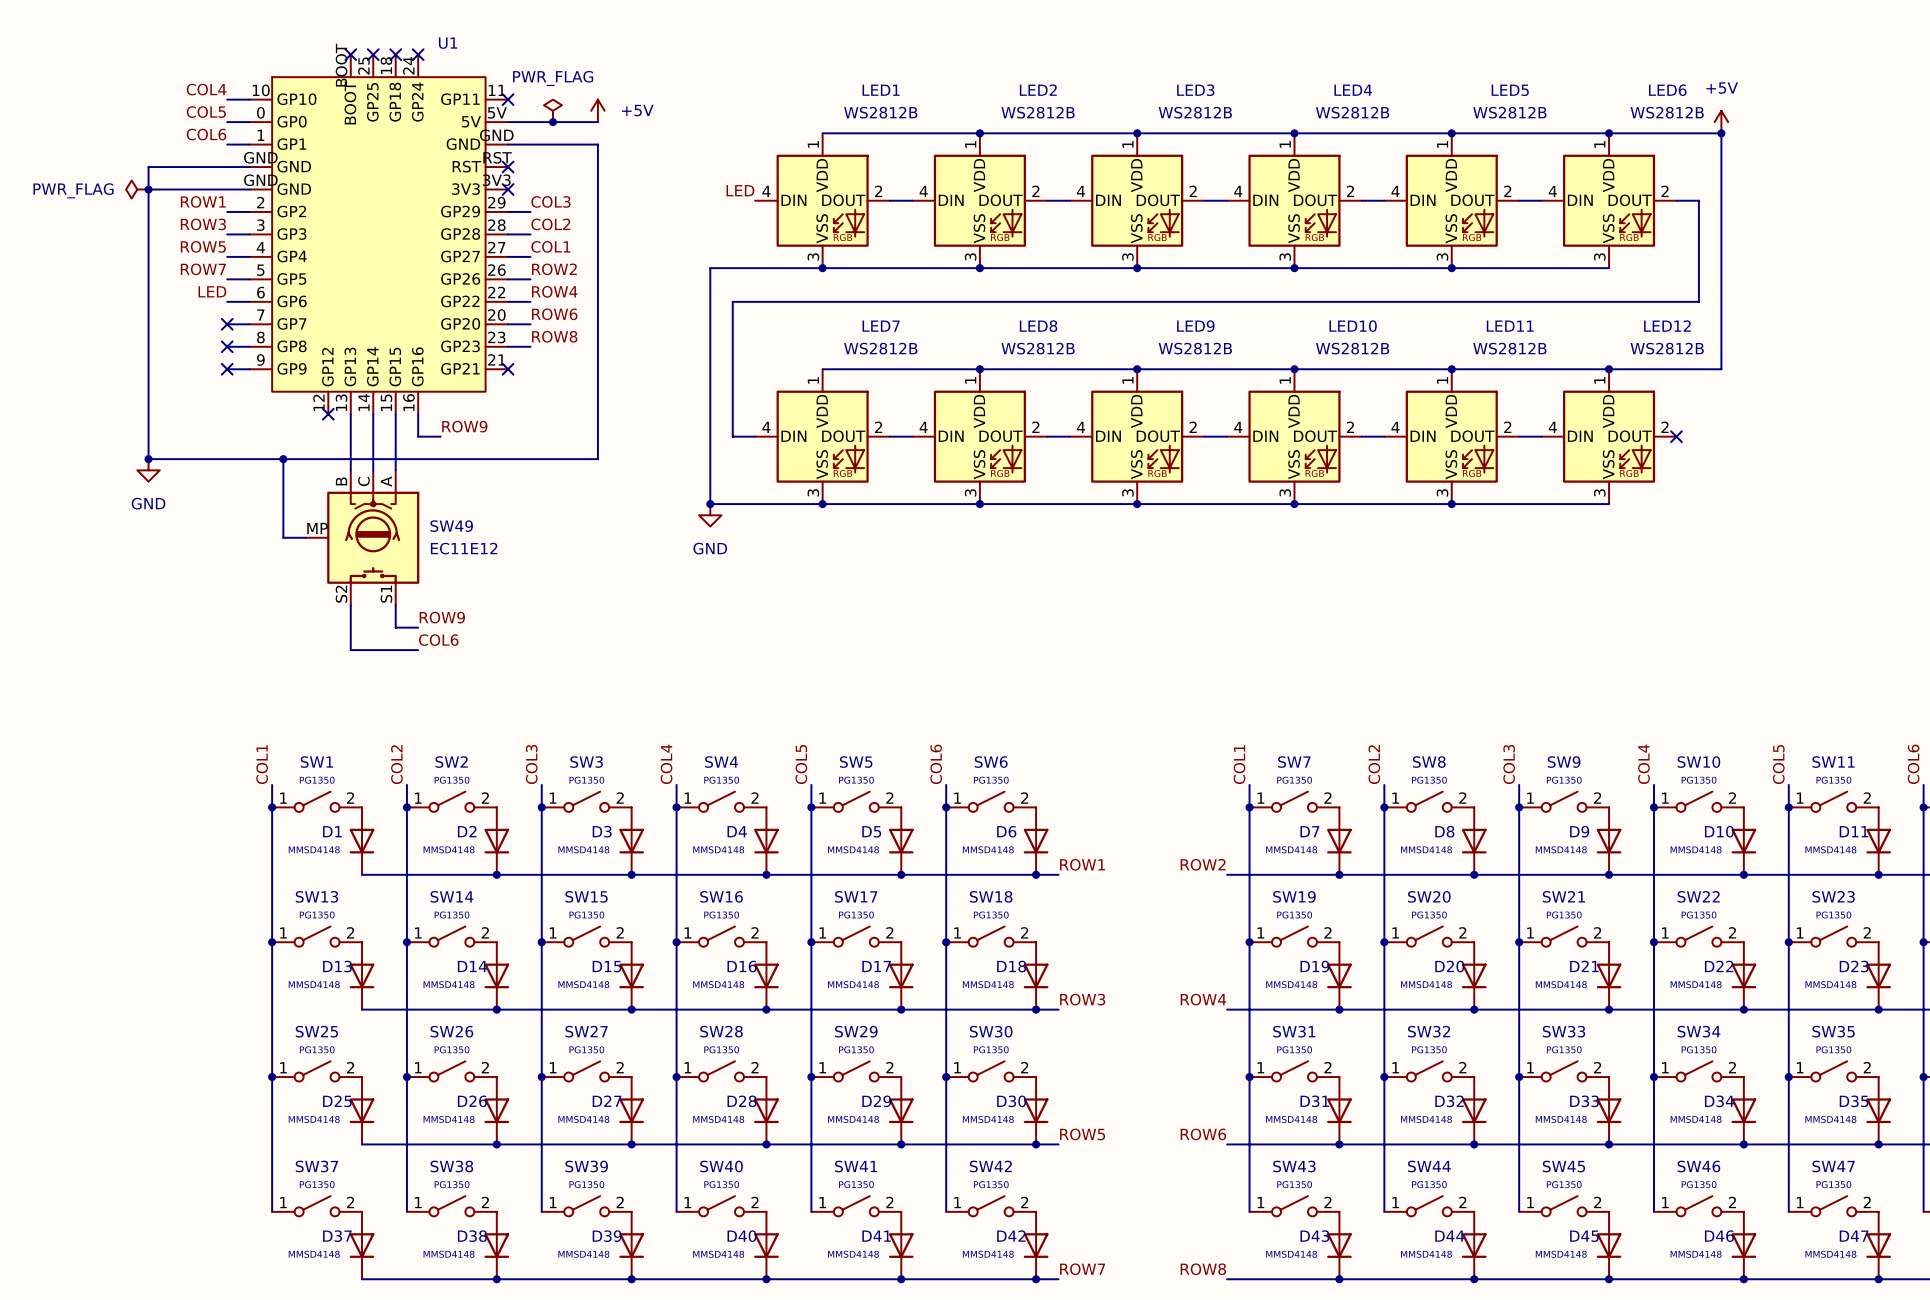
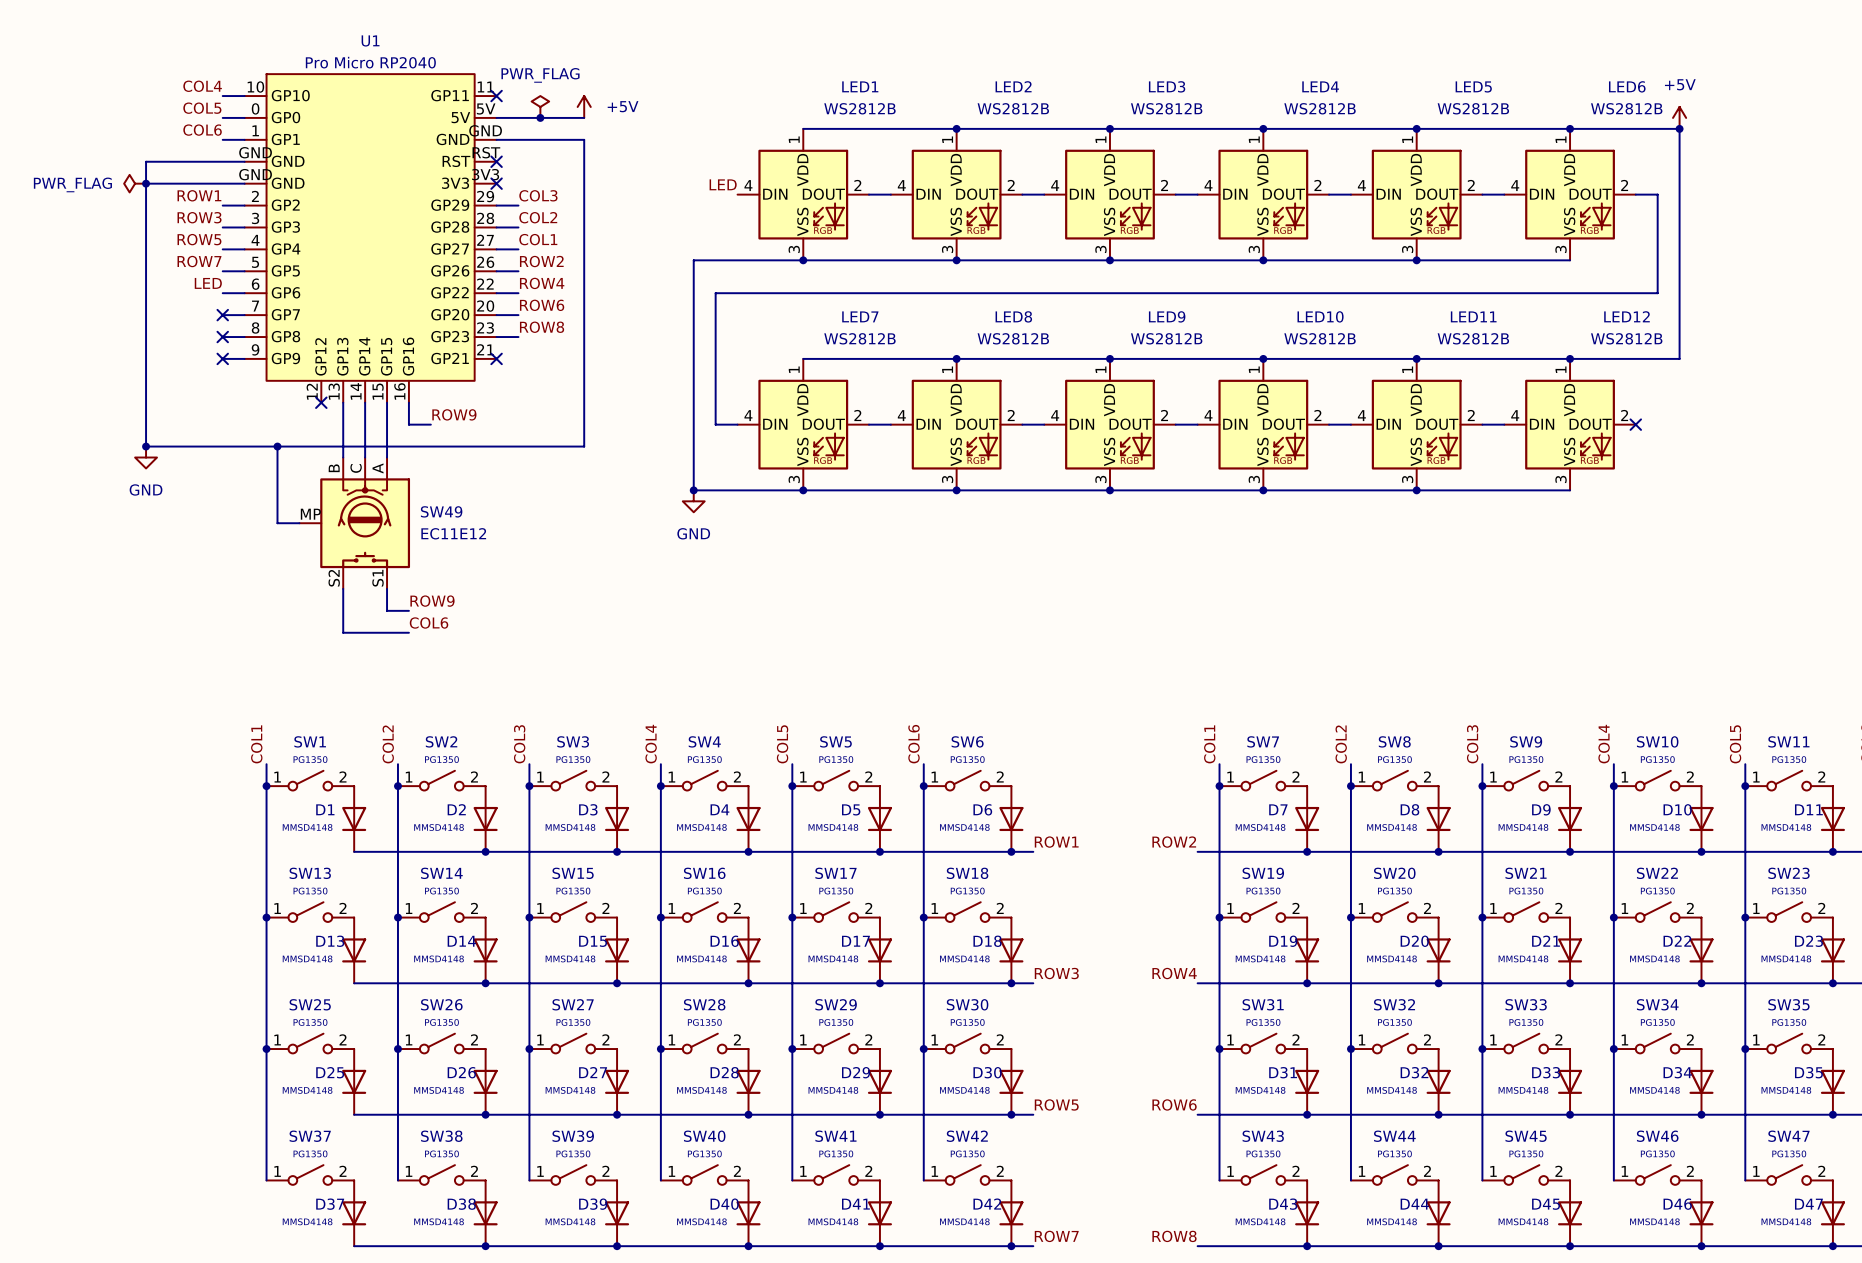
U1 name position: U1 (448, 43) -> U1 (370, 40)
U1 symbol: [249, 54, 509, 415] -> [244, 74, 497, 403]
no-connect mark: (350, 54) -> none
no-connect mark: (373, 54) -> none
no-connect mark: (395, 54) -> none
no-connect mark: (418, 54) -> none
U1 value: none -> Pro Micro RP2040 (370, 62)

